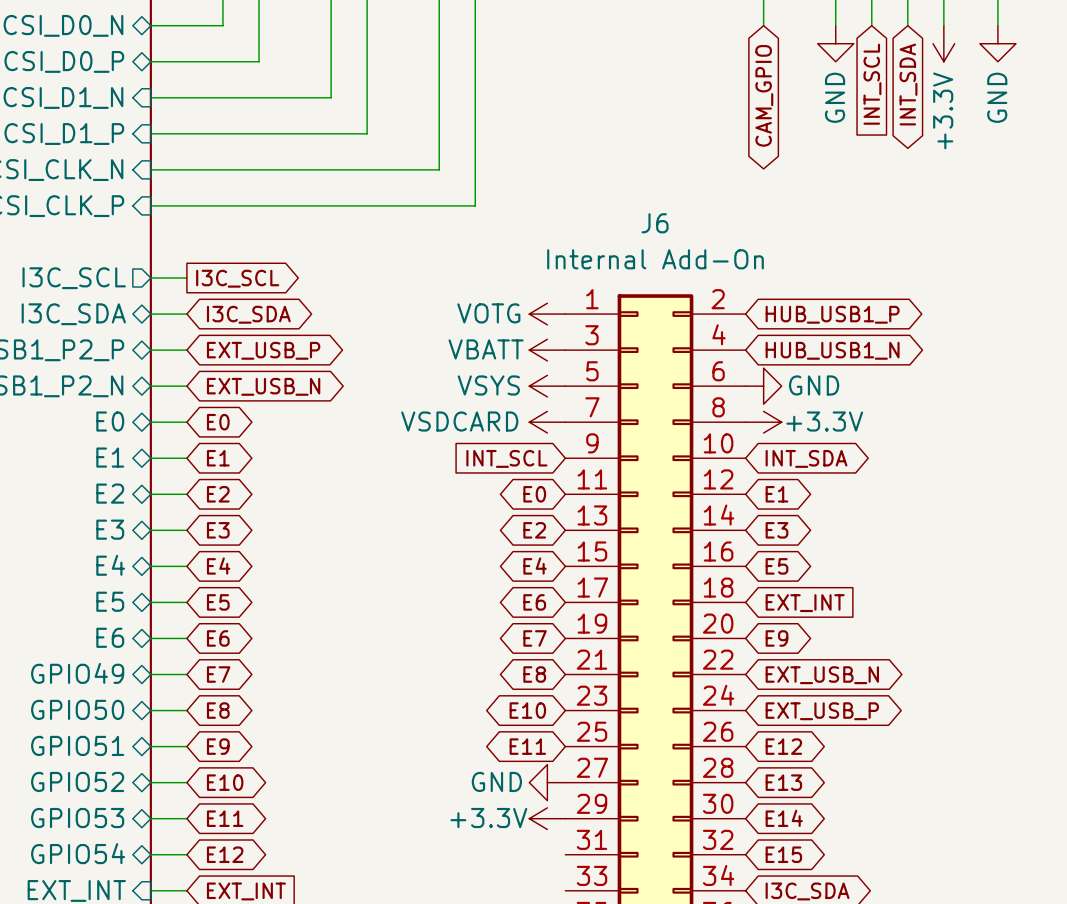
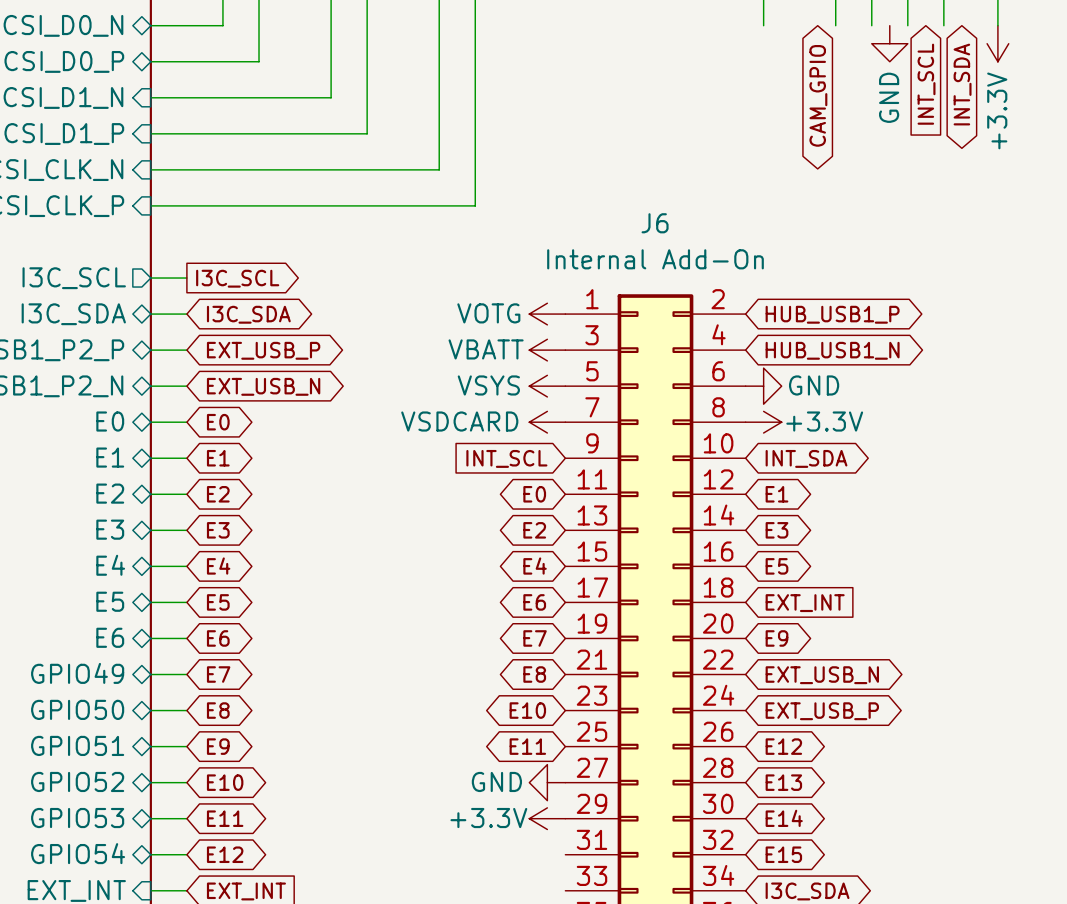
power symbol position: GND (835, 43) -> GND (889, 43)
power symbol: +3.3V (943, 43) -> none
power symbol: GND (997, 43) -> +3.3V (997, 43)
global label position: INT_SCL (872, 84) -> INT_SCL (926, 84)
global label position: INT_SDA (908, 84) -> INT_SDA (962, 84)
global label position: CAM_GPIO (764, 95) -> CAM_GPIO (818, 95)

